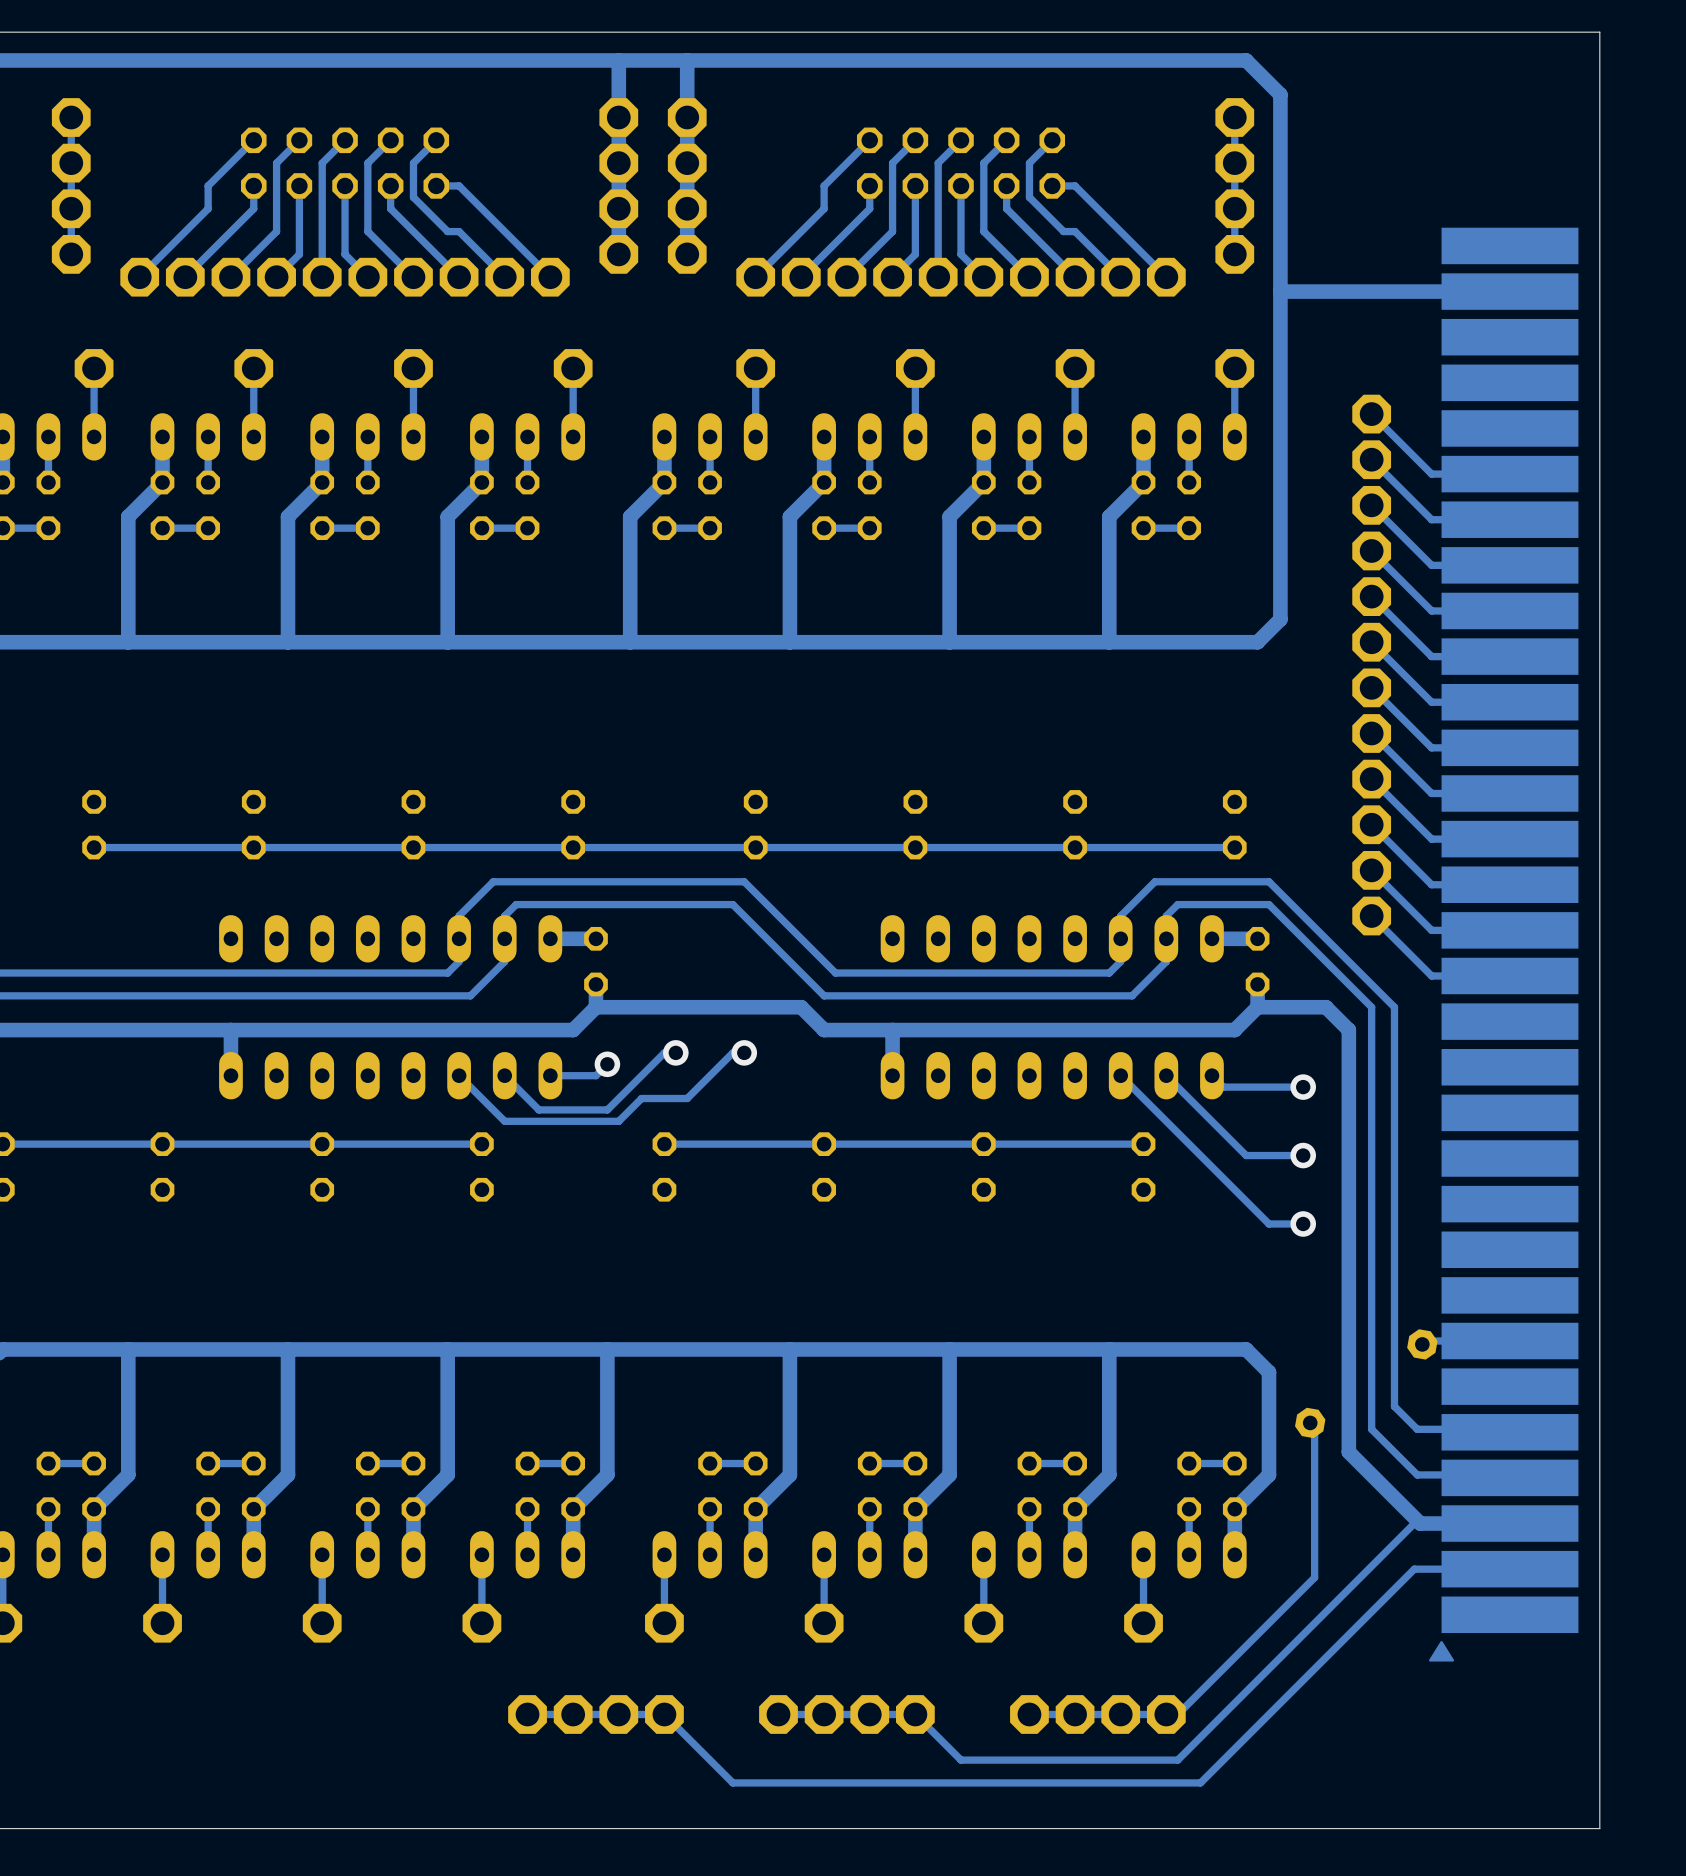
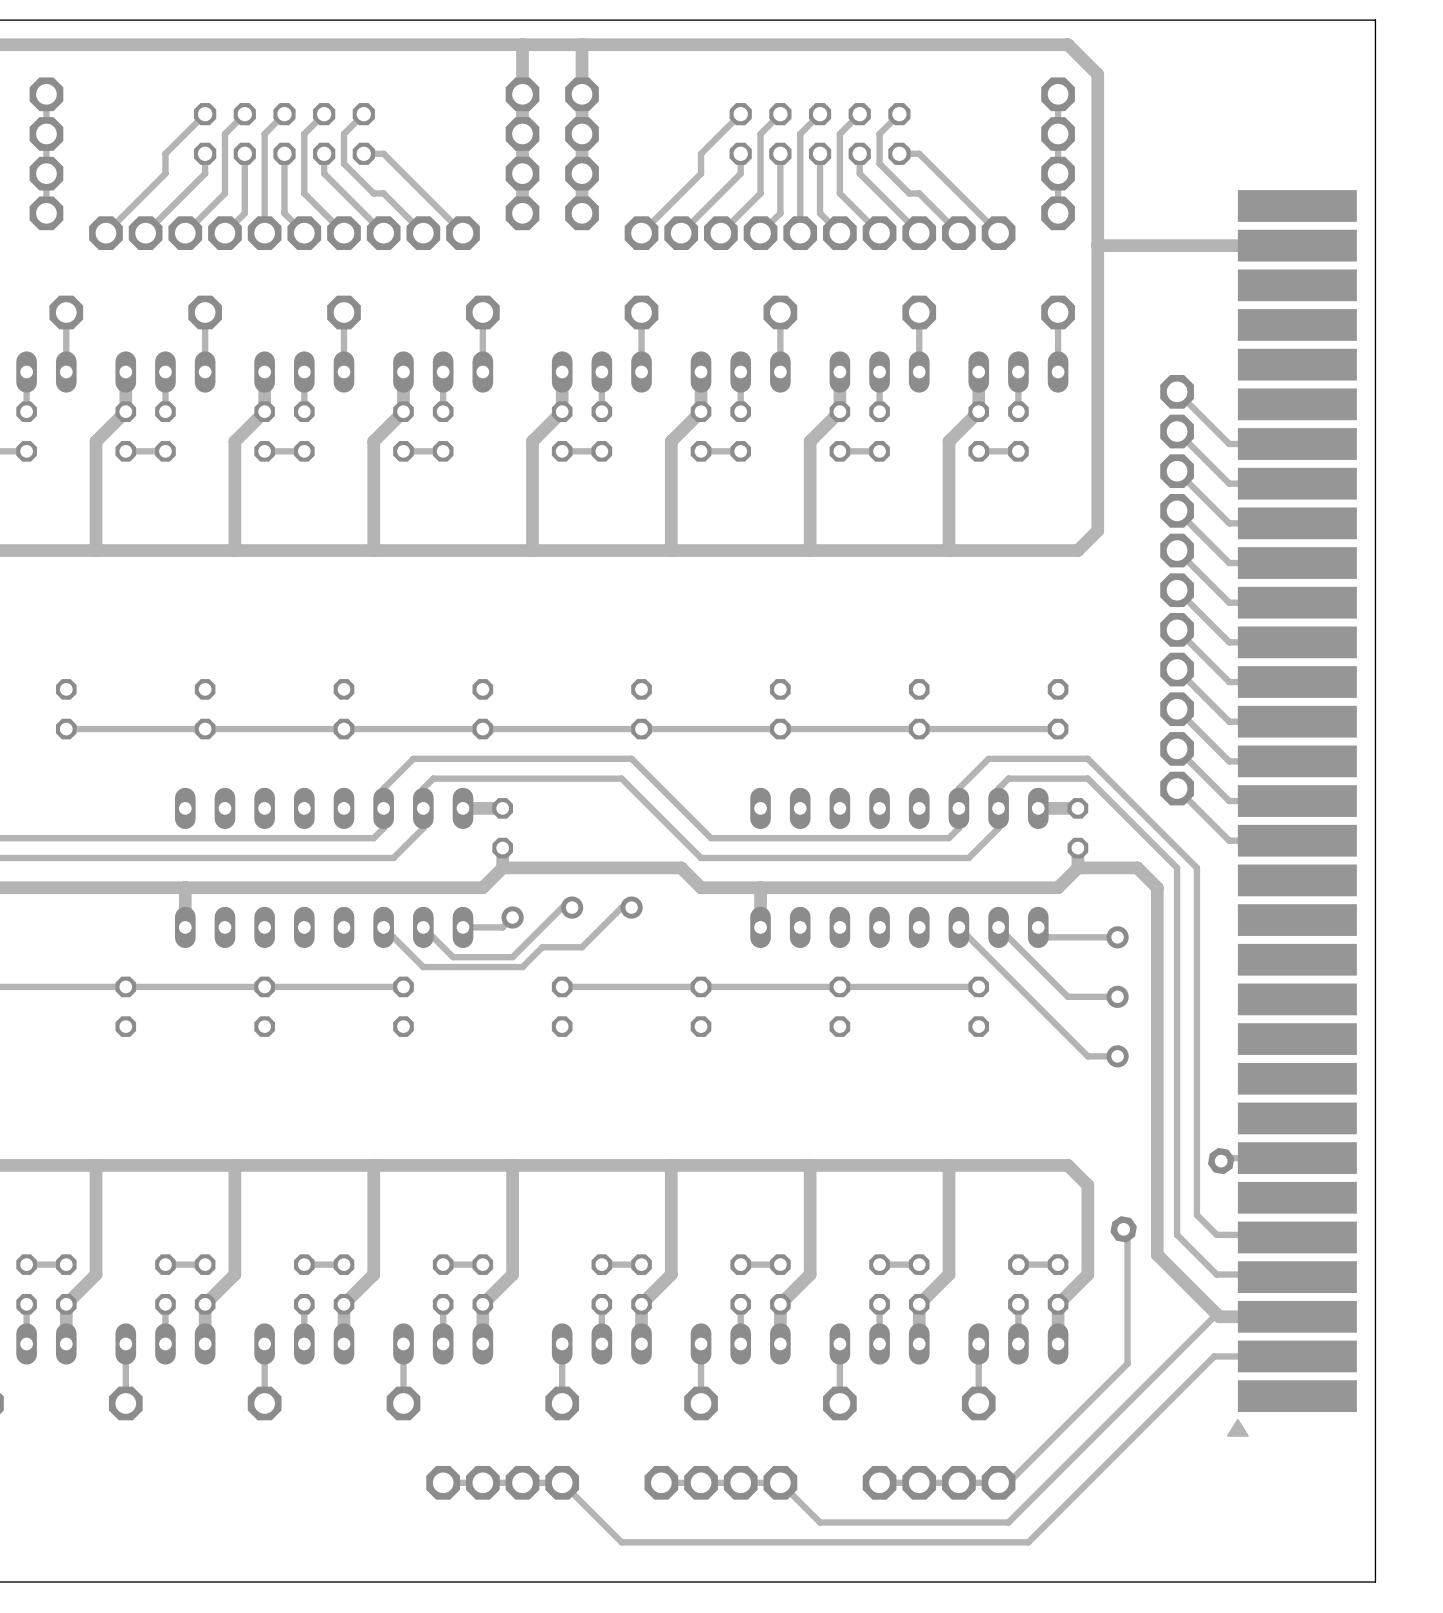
track: (1371, 414) (1431, 474) (1509, 474) -> none
part: (1371, 414) -> none

